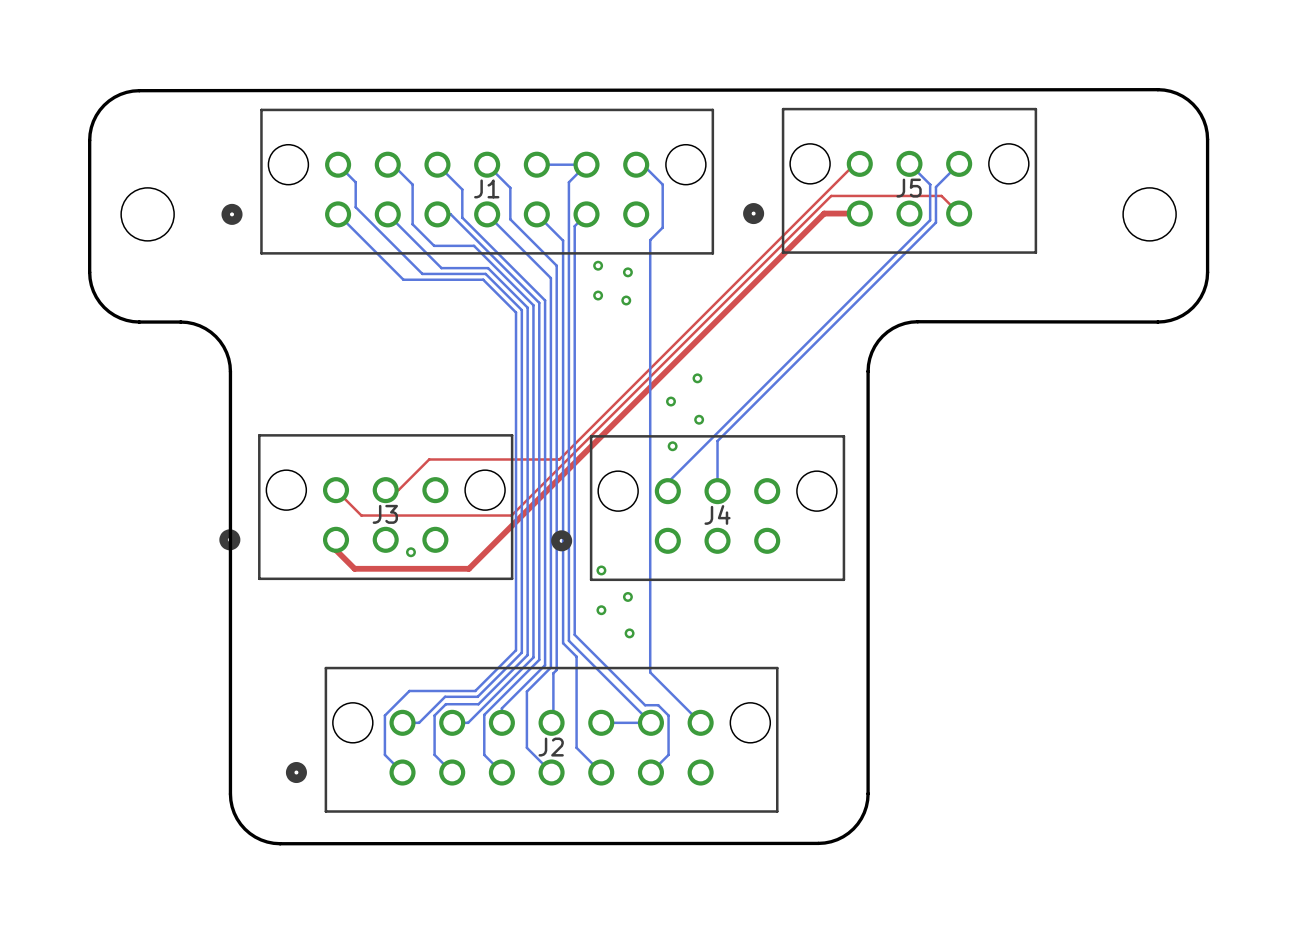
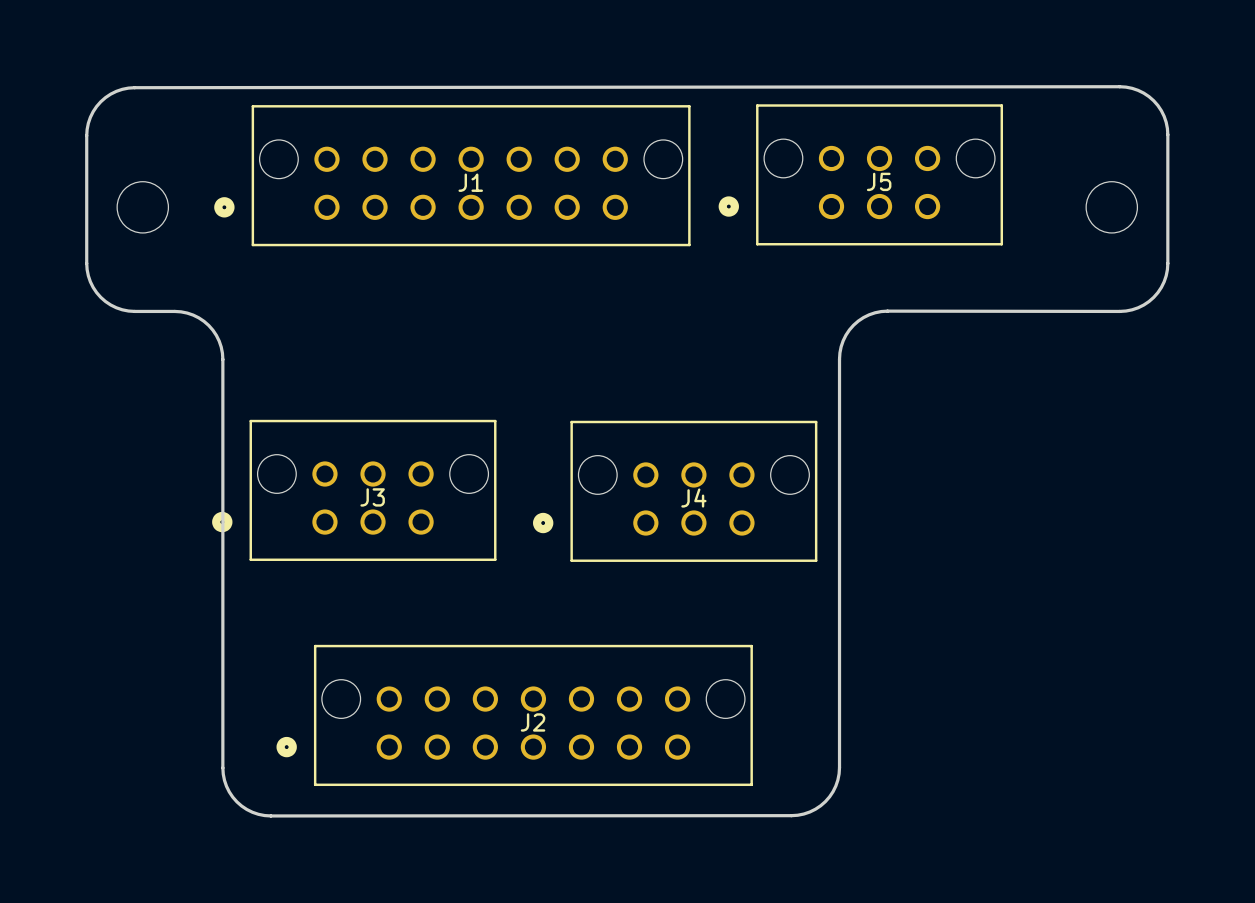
top track: (859, 163) (855, 163) (559, 459) (429, 459) (398, 490) (385, 490) -> none
bottom track: (909, 163) (930, 184) (930, 220) (667, 482) (667, 491) -> none
bottom track: (959, 163) (935, 187) (935, 222) (717, 441) (717, 491) -> none
bottom track: (338, 164) (355, 182) (355, 207) (422, 273) (485, 273) (521, 310) (521, 652) (477, 696) (445, 696) (419, 722) (402, 722) -> none
bottom track: (387, 164) (392, 164) (412, 184) (412, 224) (434, 245) (474, 245) (533, 305) (533, 657) (468, 722) (452, 722) -> none
bottom track: (437, 164) (462, 189) (462, 217) (545, 300) (545, 665) (501, 708) (501, 722) -> none
bottom track: (487, 164) (510, 187) (510, 219) (556, 265) (556, 669) (553, 673) (553, 721) (551, 722) -> none
bottom track: (536, 164) (586, 164) (568, 182) (568, 640) (650, 722) (601, 722) -> none
bottom track: (636, 164) (642, 164) (662, 184) (662, 227) (650, 240) (650, 672) (700, 722) -> none
top track: (859, 213) (824, 213) (468, 568) (354, 568) (336, 550) (336, 539) -> none
top track: (959, 213) (941, 195) (831, 195) (511, 515) (361, 515) (336, 490) -> none
bottom track: (338, 214) (403, 279) (483, 279) (516, 312) (516, 650) (475, 690) (409, 690) (384, 715) (384, 754) (402, 772) -> none
bottom track: (387, 214) (441, 268) (488, 268) (527, 307) (527, 655) (478, 704) (445, 704) (434, 715) (434, 754) (452, 772) -> none
bottom track: (437, 214) (450, 214) (539, 302) (539, 659) (484, 714) (484, 754) (501, 772) -> none
bottom track: (487, 214) (550, 278) (550, 667) (526, 691) (526, 747) (551, 772) -> none
bottom track: (536, 214) (563, 240) (563, 643) (576, 656) (576, 747) (601, 772) -> none
bottom track: (586, 214) (574, 226) (574, 634) (645, 705) (658, 705) (668, 715) (668, 754) (650, 772) -> none
via: (598, 265) -> none
via: (627, 272) -> none
via: (598, 295) -> none
via: (626, 300) -> none
via: (697, 378) -> none
via: (670, 401) -> none
via: (699, 419) -> none
via: (672, 446) -> none
via: (410, 552) -> none
via: (601, 570) -> none
via: (627, 596) -> none
via: (601, 610) -> none
via: (629, 633) -> none

